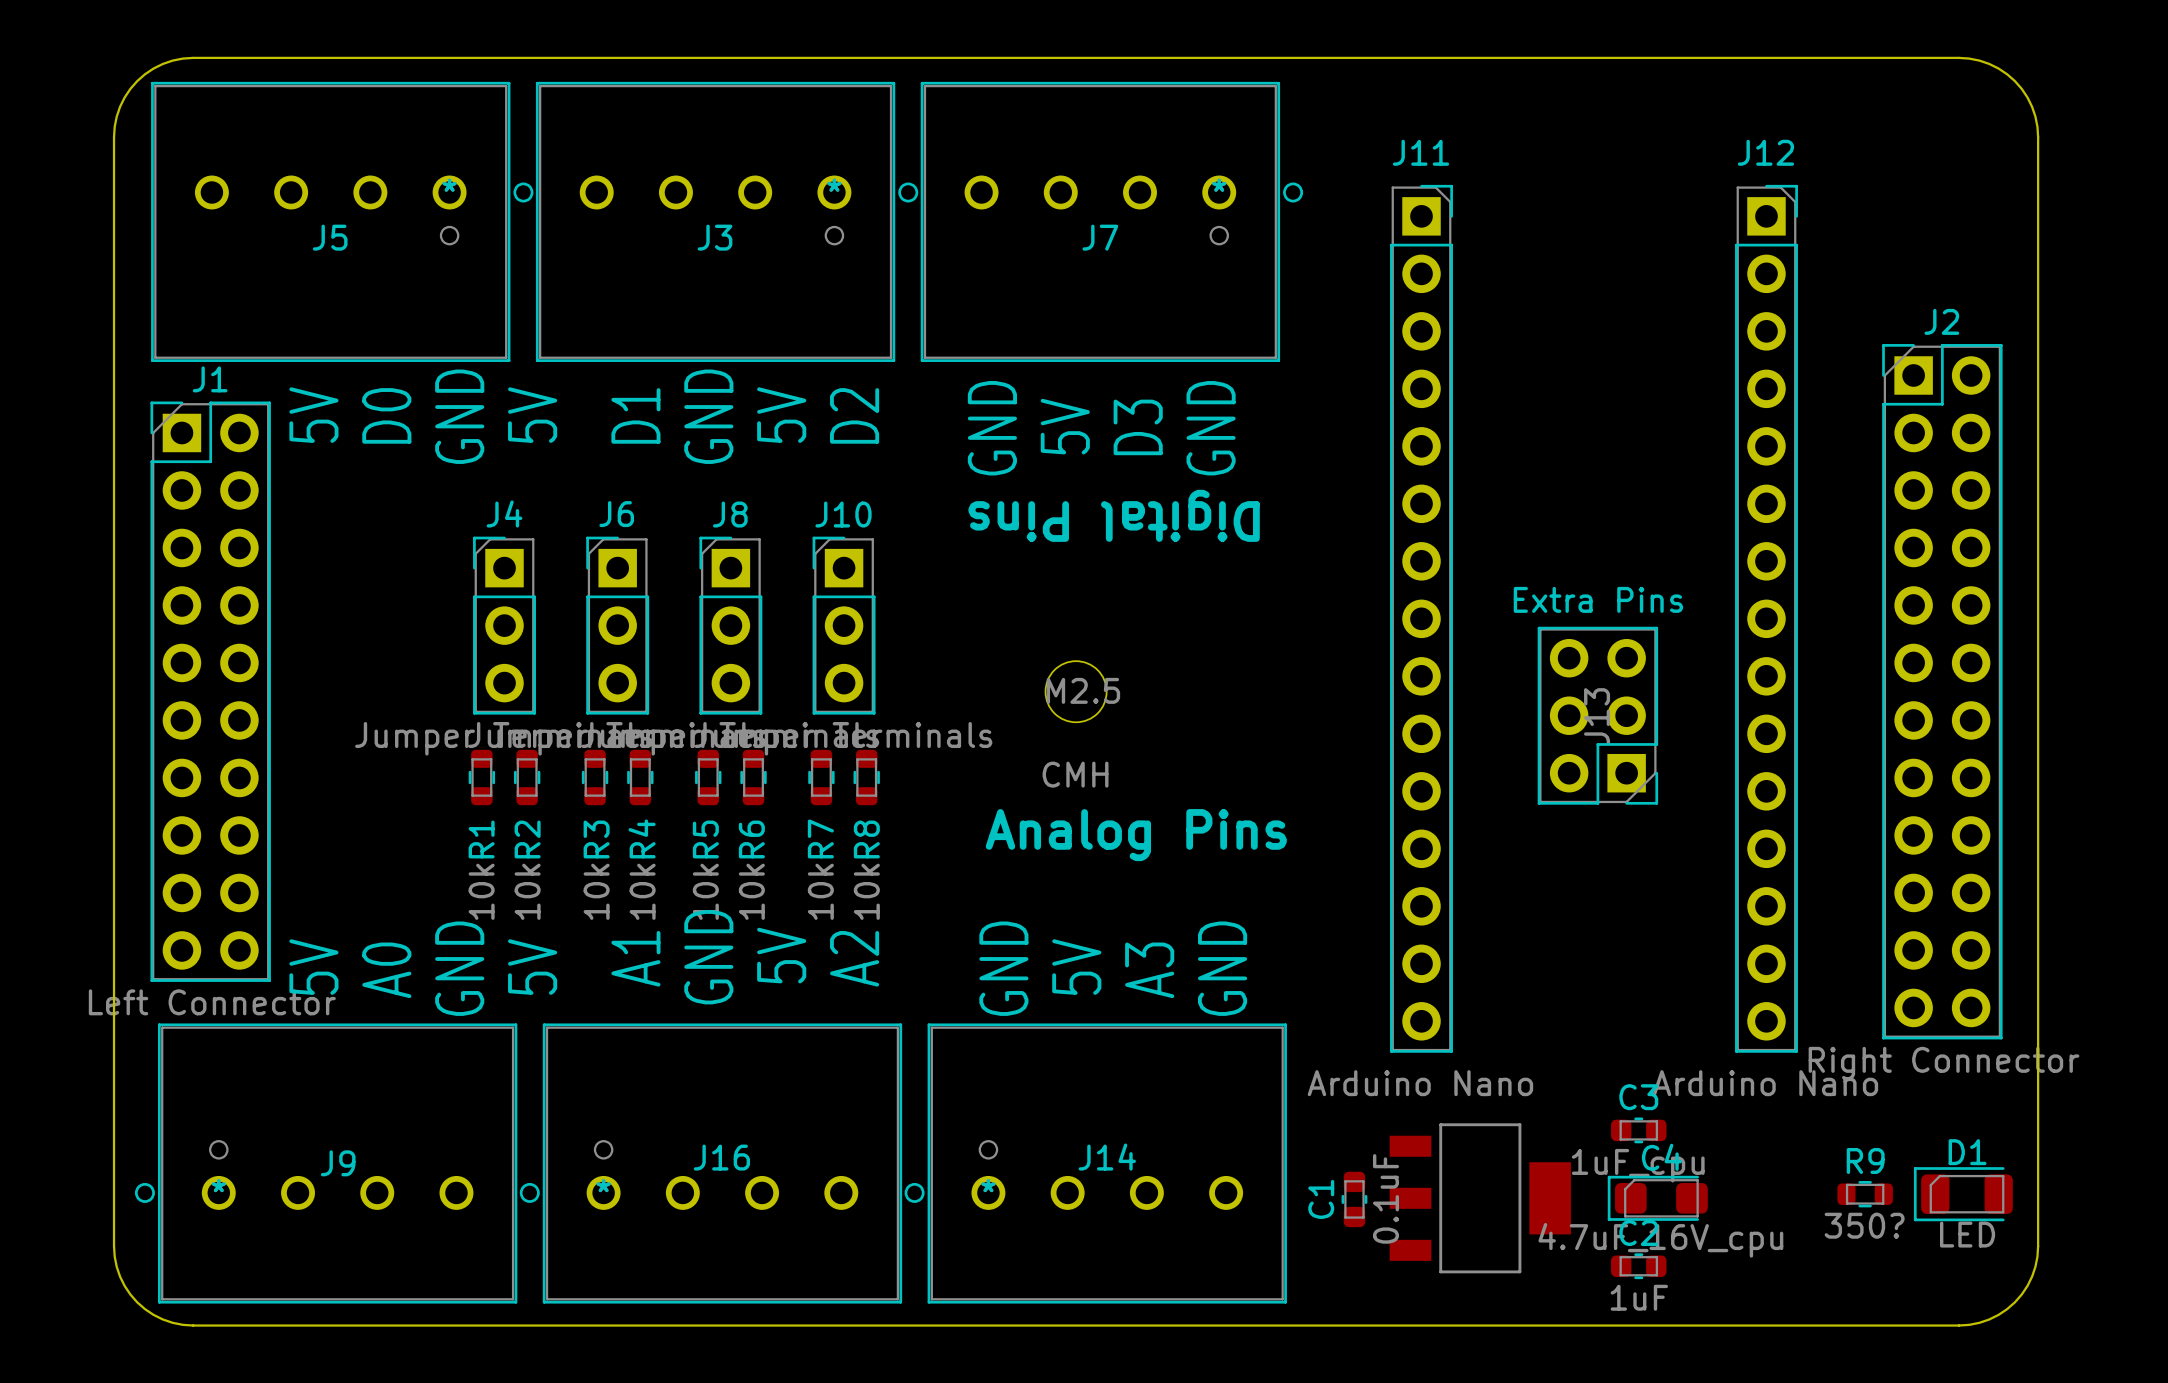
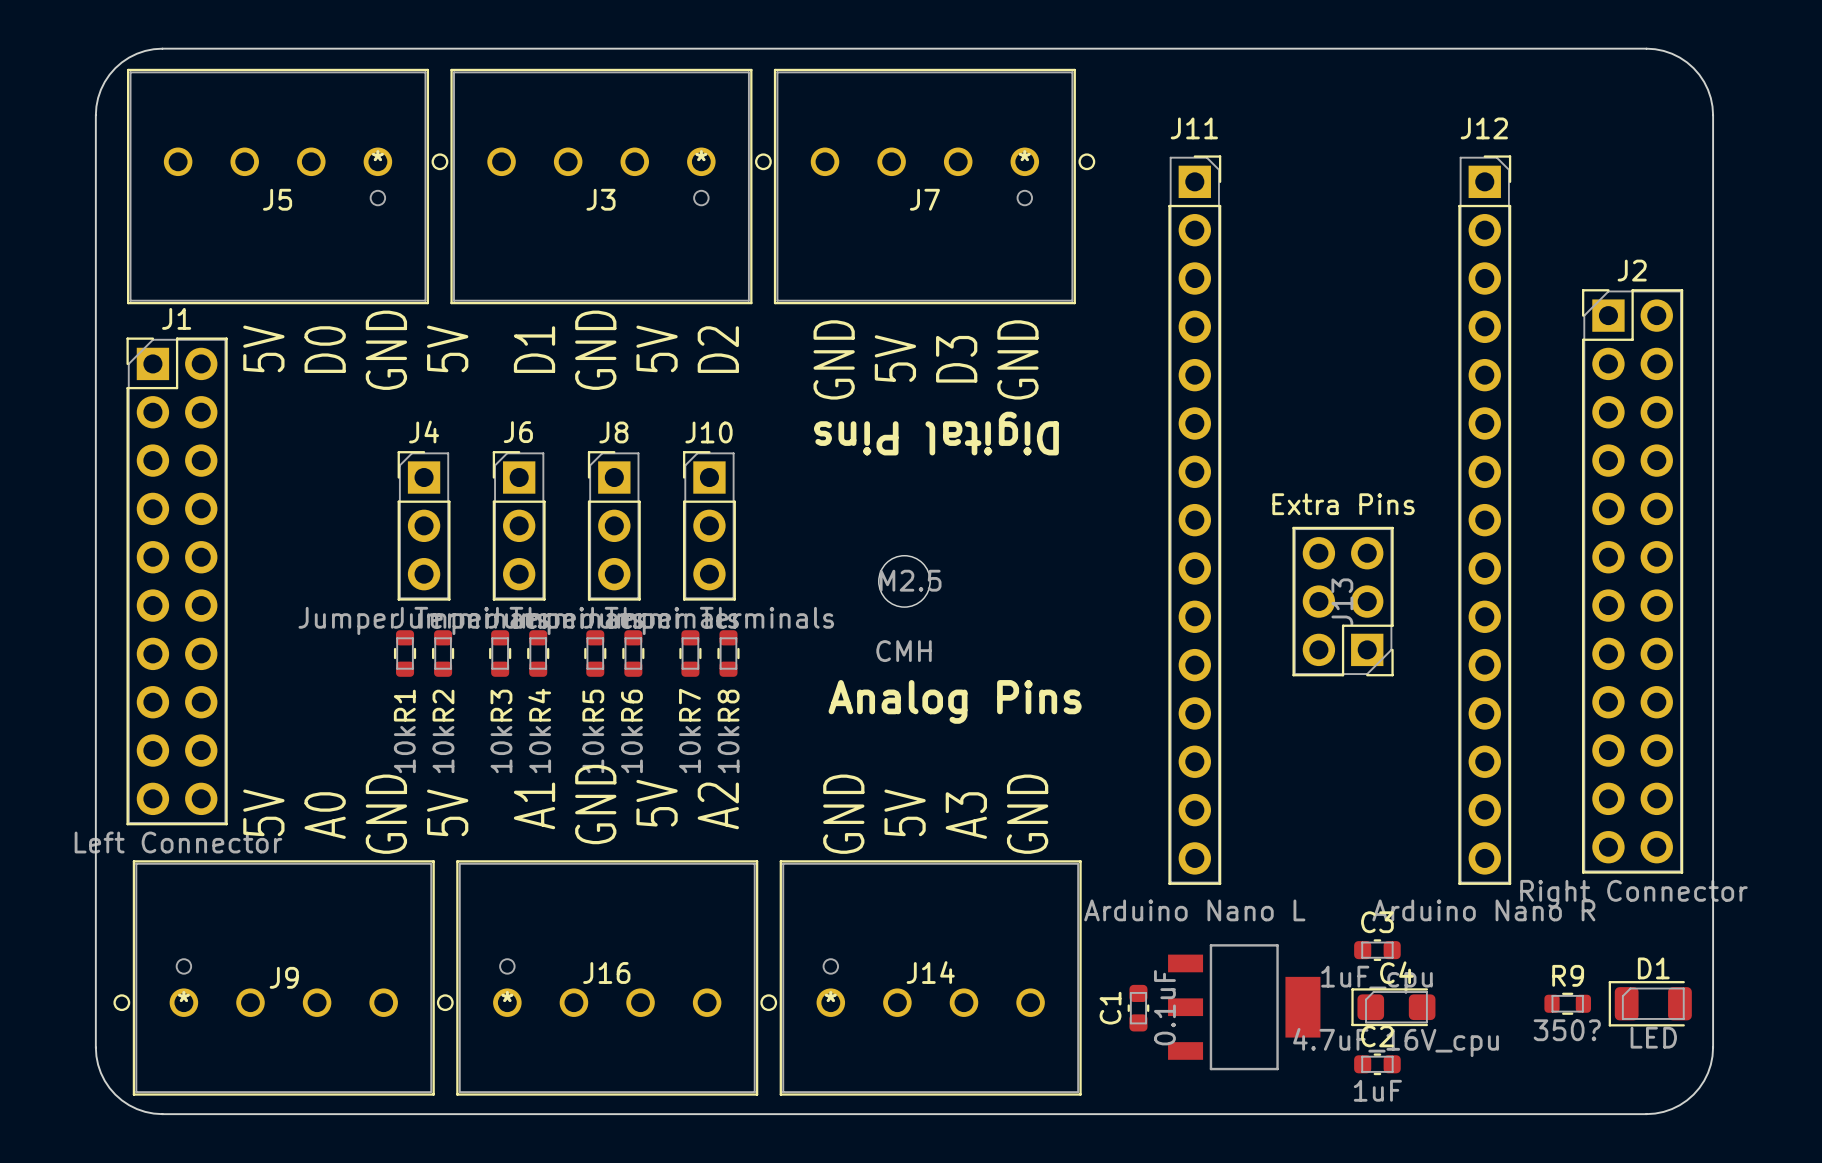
J11 value: Arduino Nano (1420, 1083) -> Arduino Nano L (1194, 910)
J12 value: Arduino Nano (1765, 1083) -> Arduino Nano R (1483, 910)

